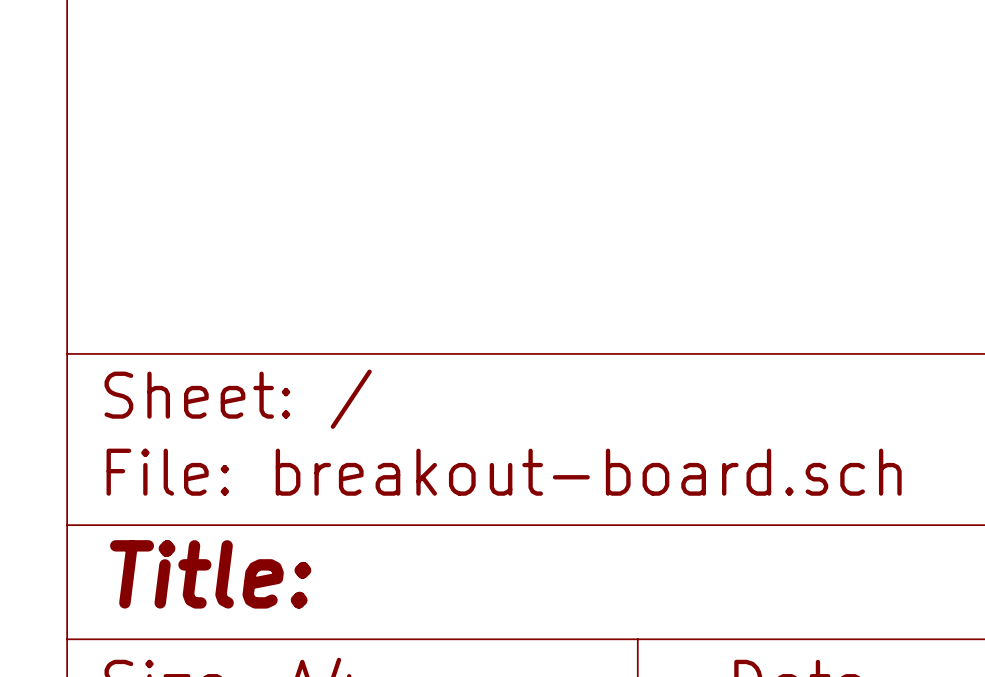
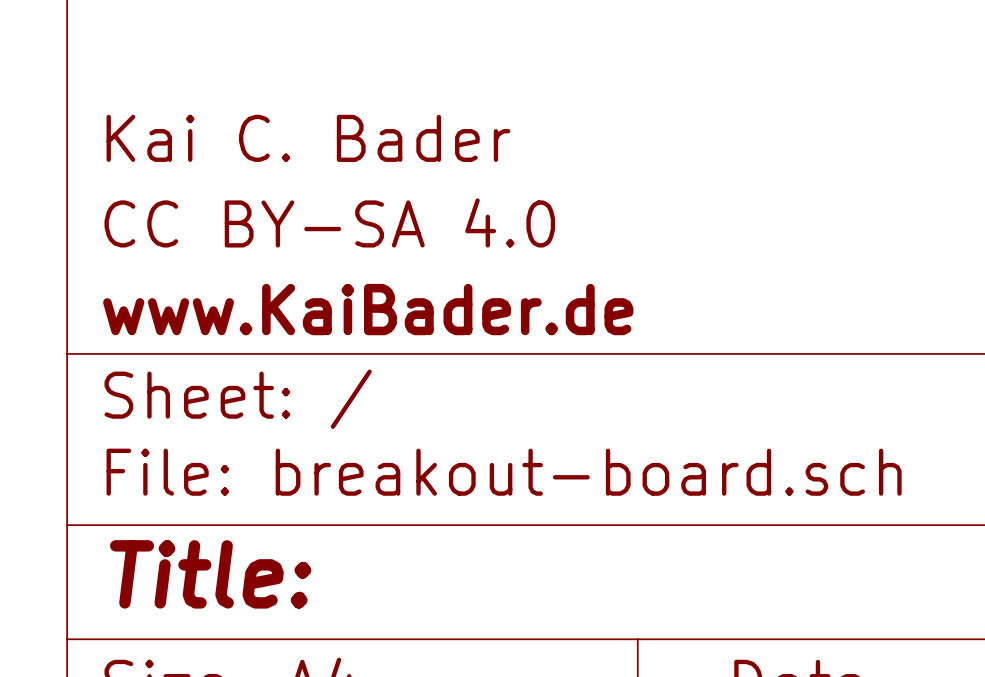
title block: none -> Kai C. Bader (308, 138)
title block: none -> CC BY-SA 4.0 (329, 222)
title block: none -> www.KaiBader.de (368, 309)

